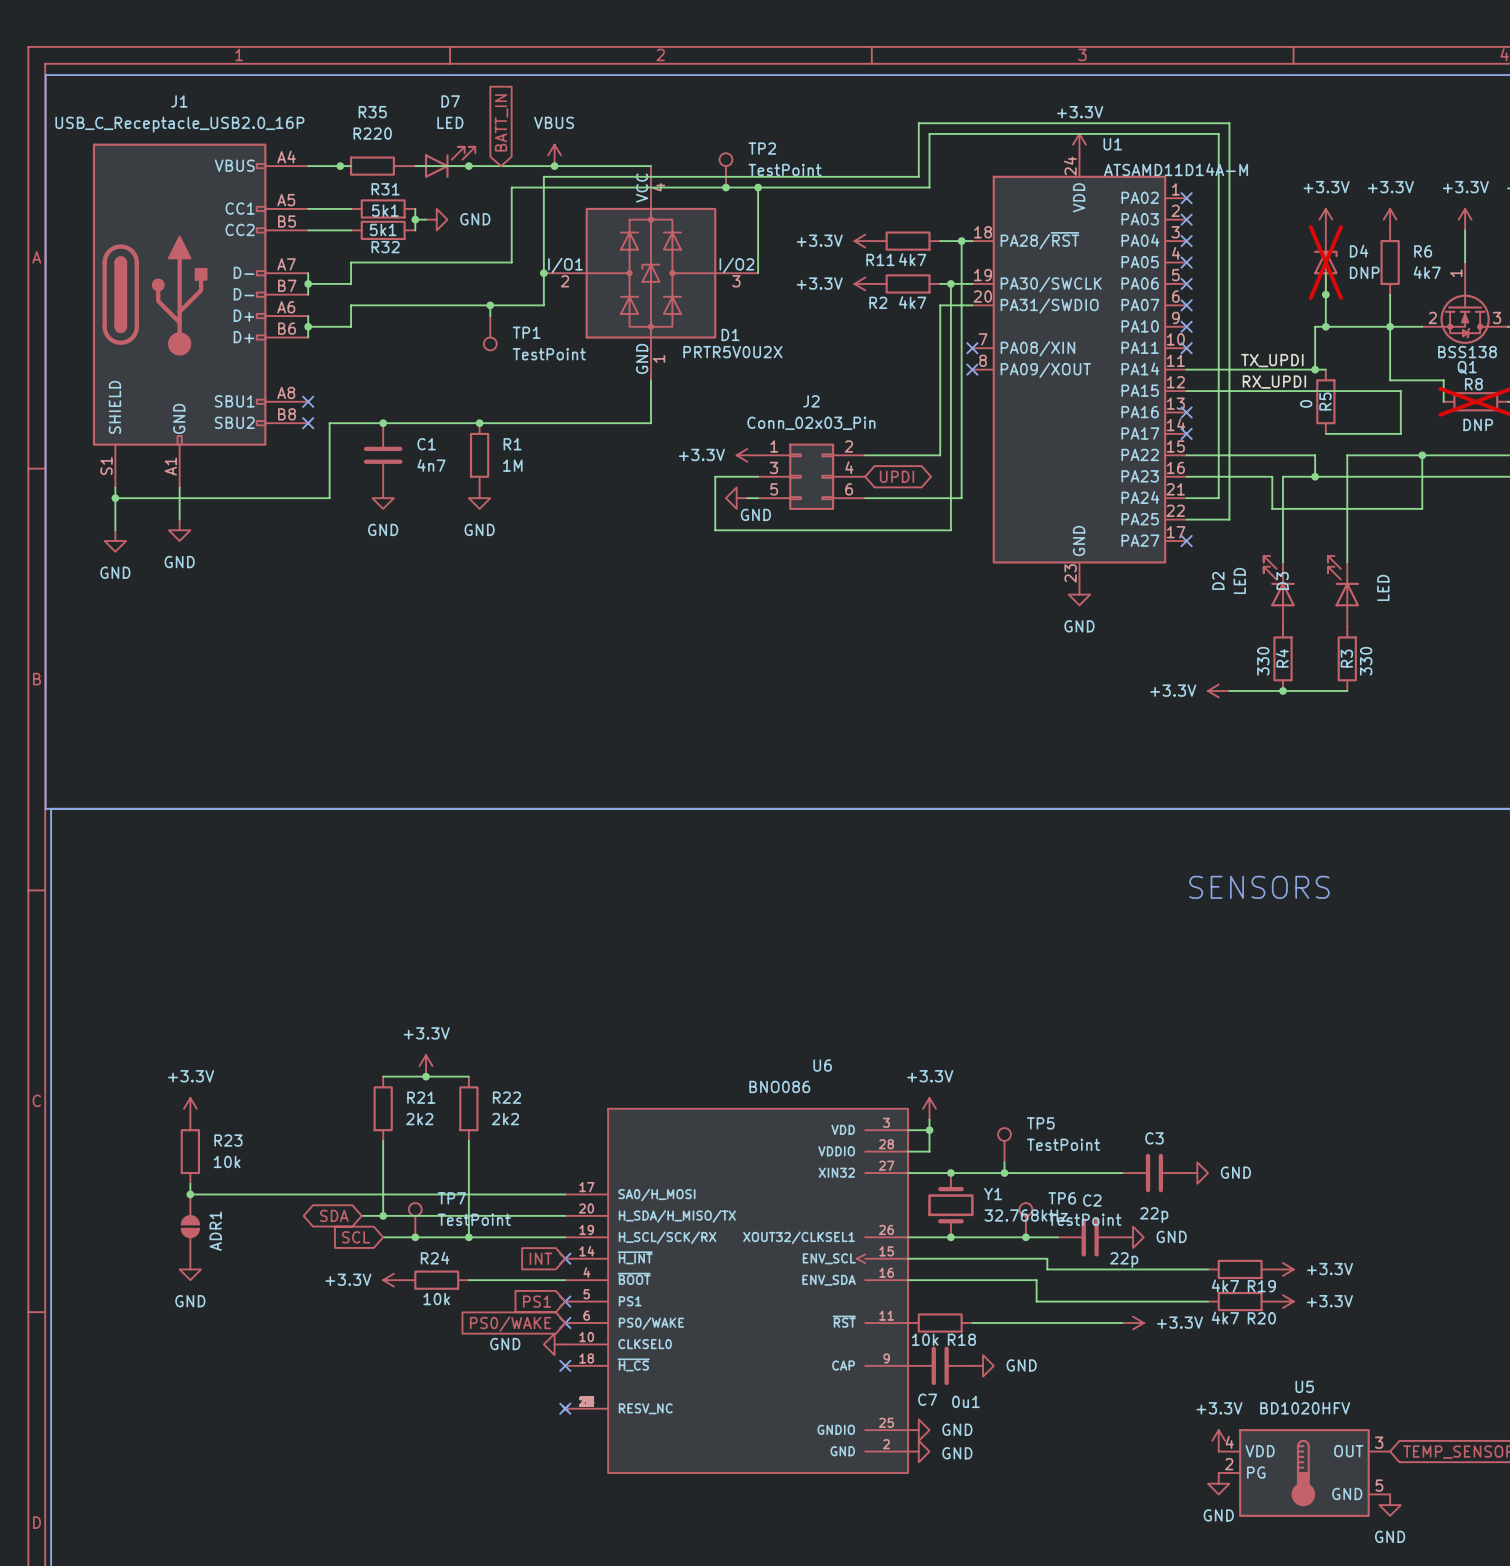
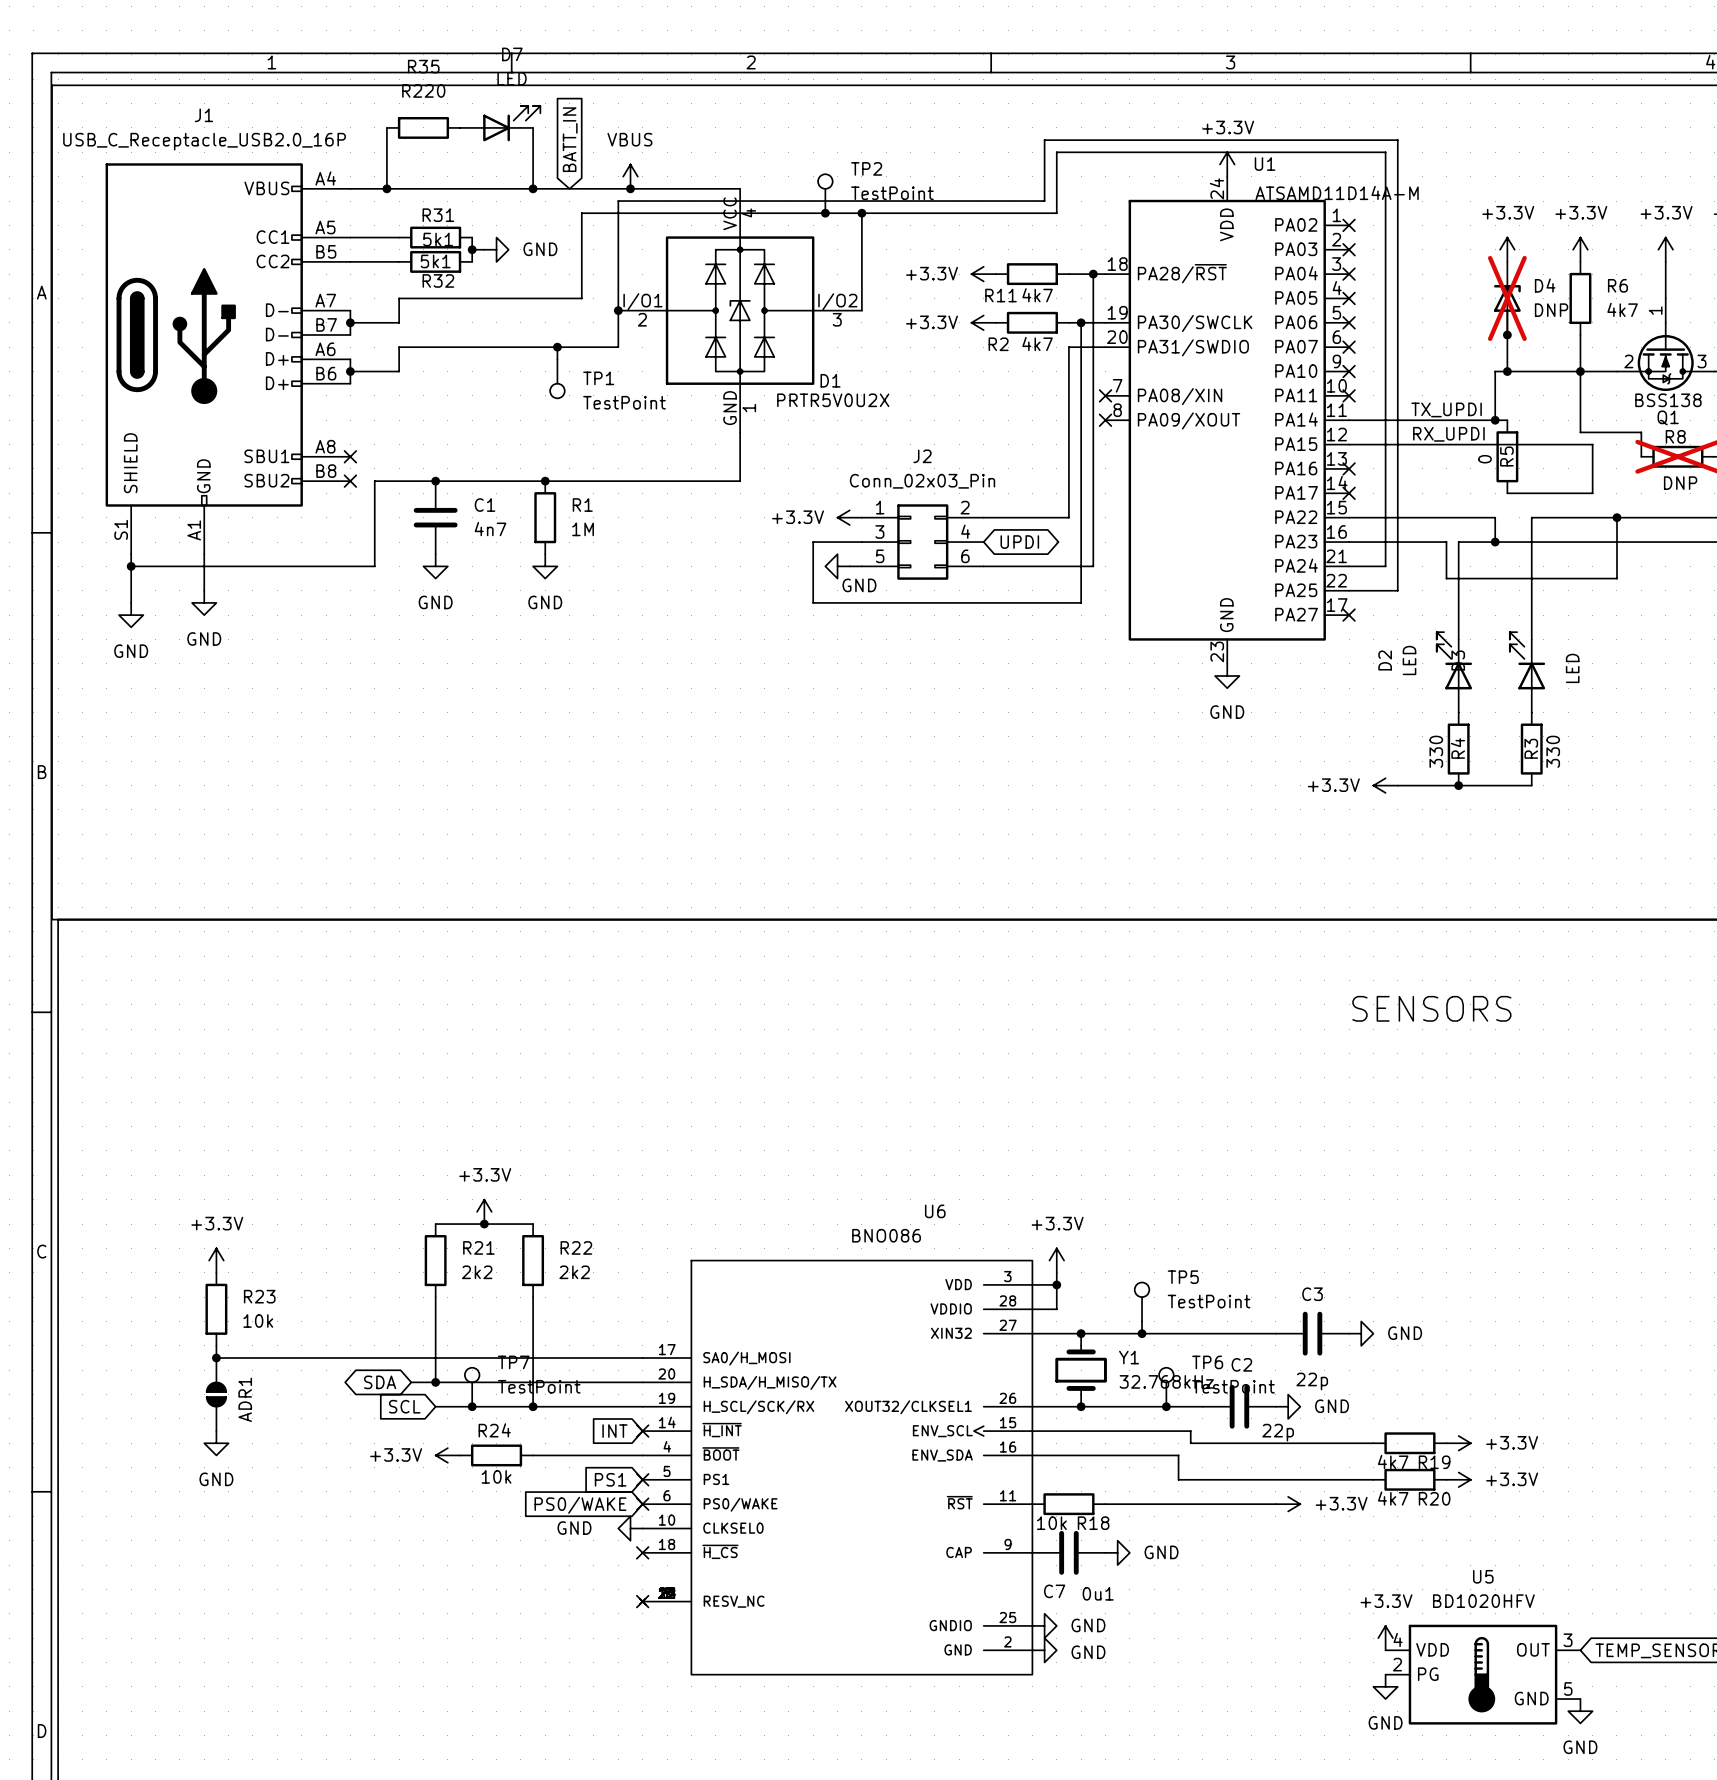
wire: none -> (386, 127) (386, 188)
wire: none -> (533, 127) (533, 188)
D7 position: (439, 162) -> (500, 123)
wire: none -> (399, 188) (472, 188)
R35 position: (372, 166) -> (423, 127)

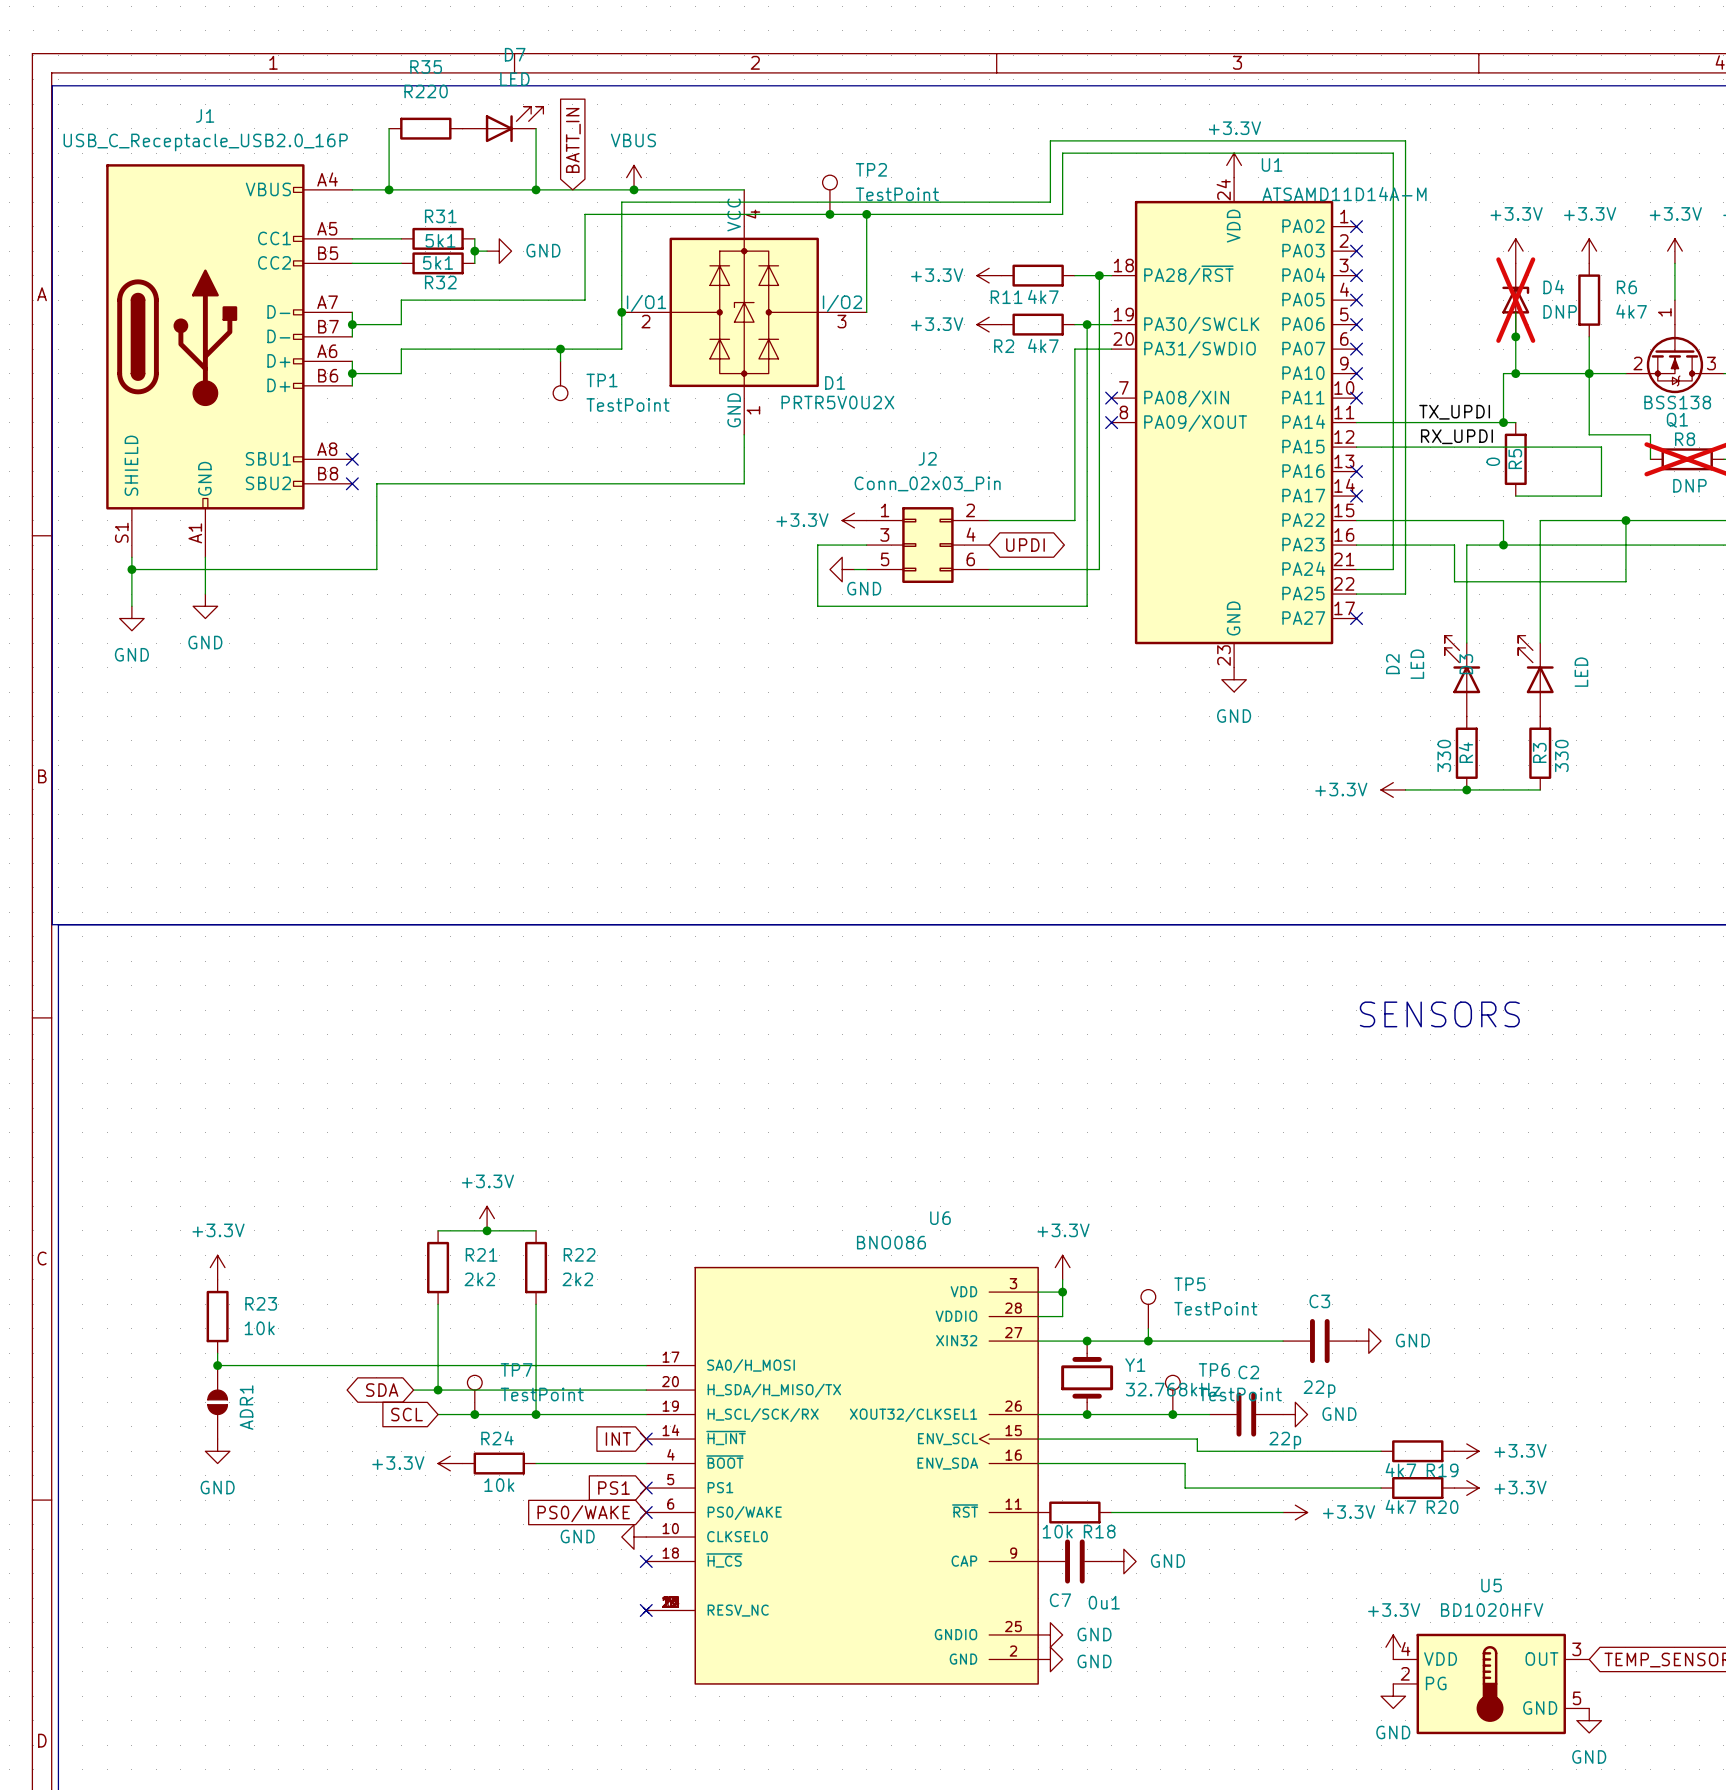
junction: (435, 481) -> none
junction: (545, 481) -> none
C1: 4n7 (435, 517) -> none
R1: 1M (545, 517) -> none
power symbol: GND (435, 566) -> none
power symbol: GND (545, 566) -> none

